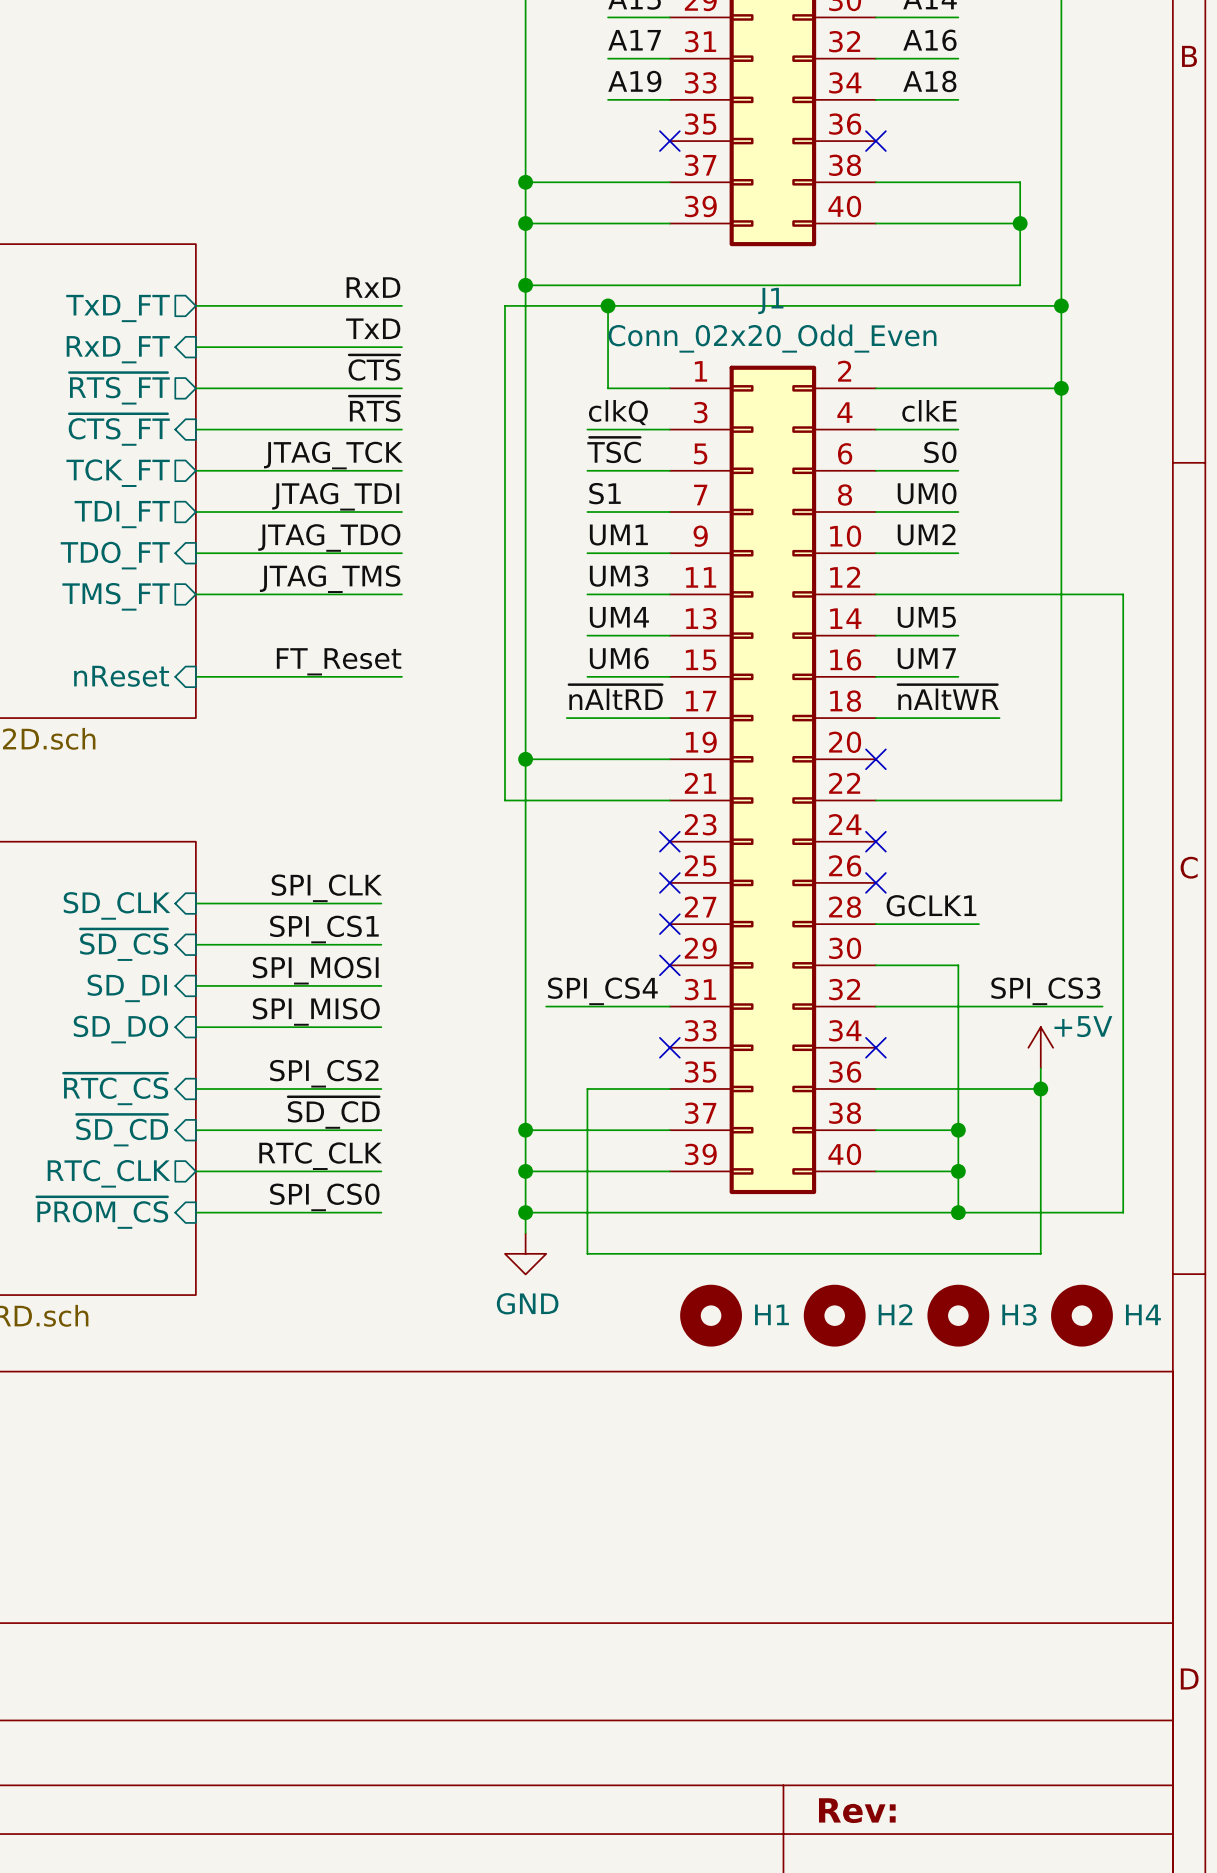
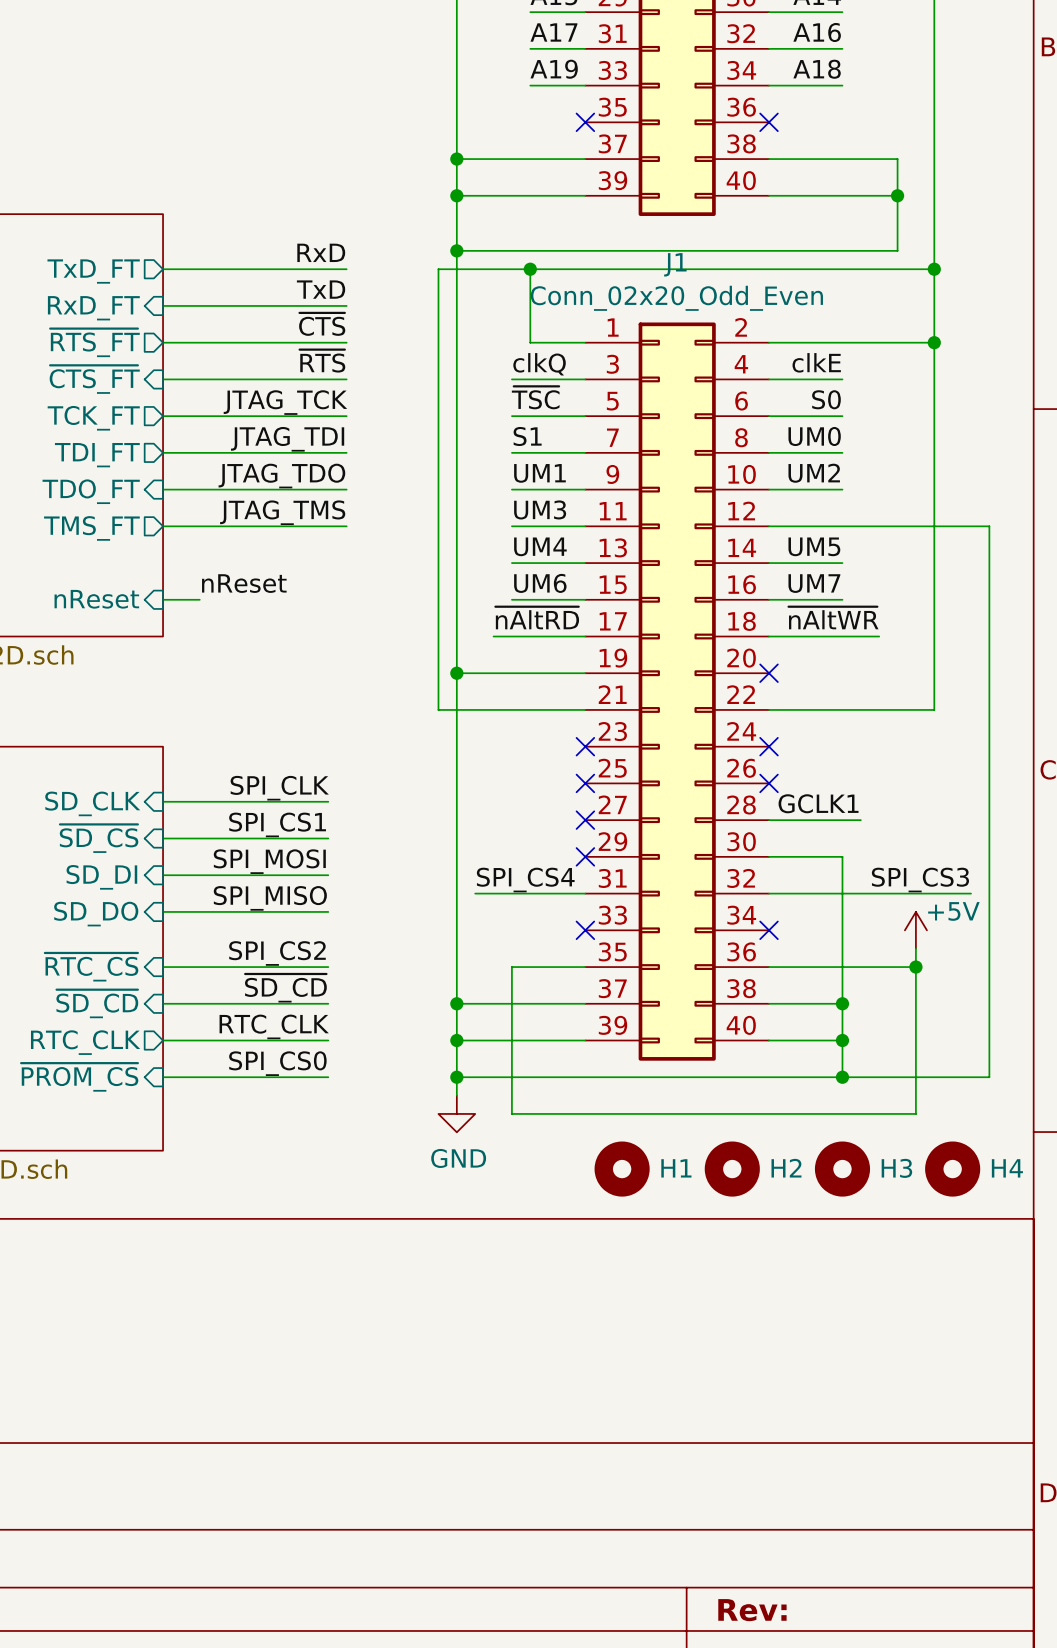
label: FT_Reset (339, 661) -> nReset (244, 583)
wire: (237, 676) (401, 676) -> none

